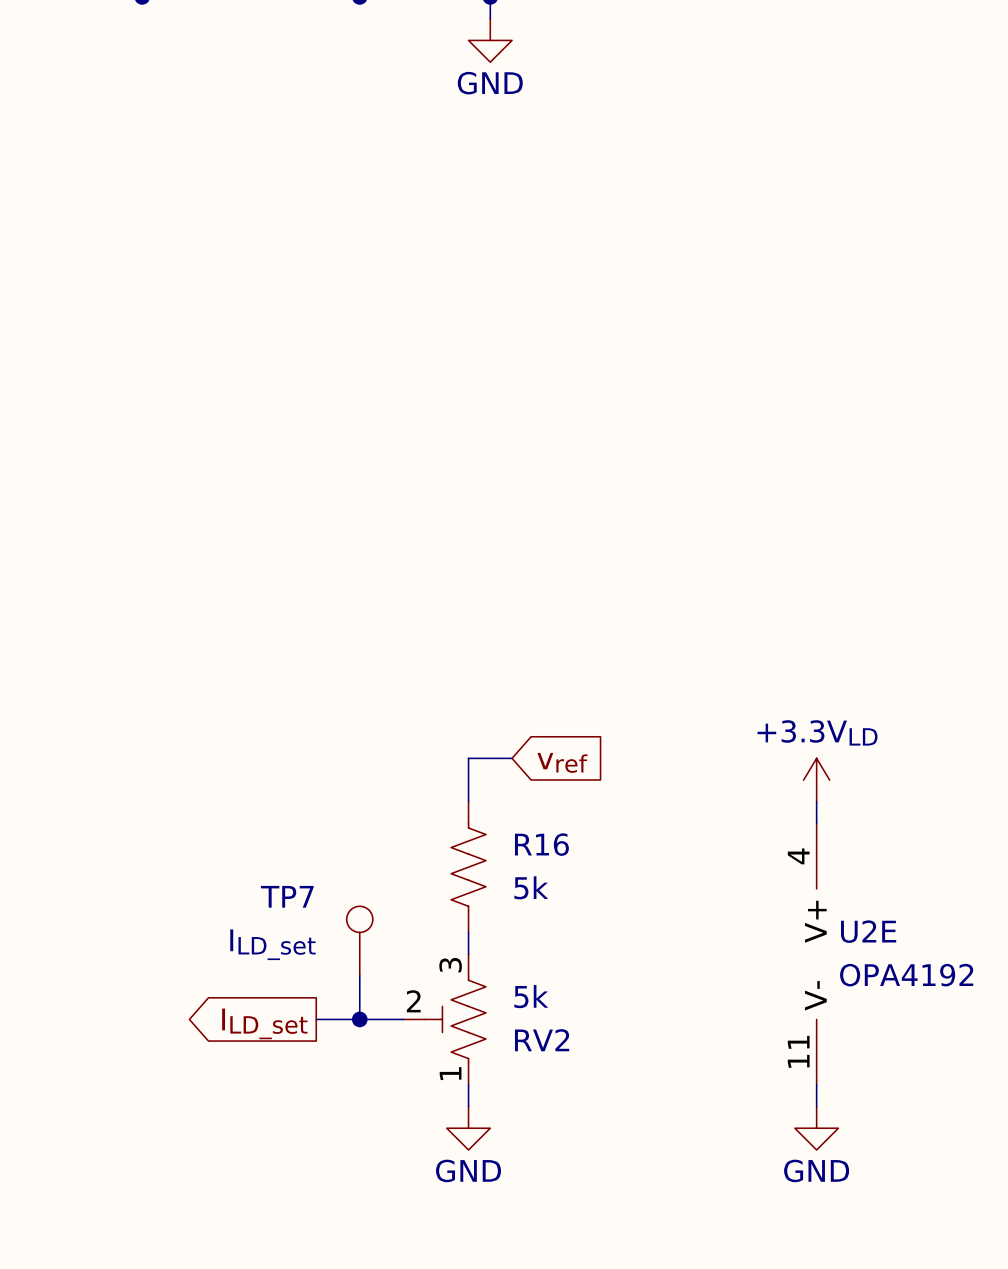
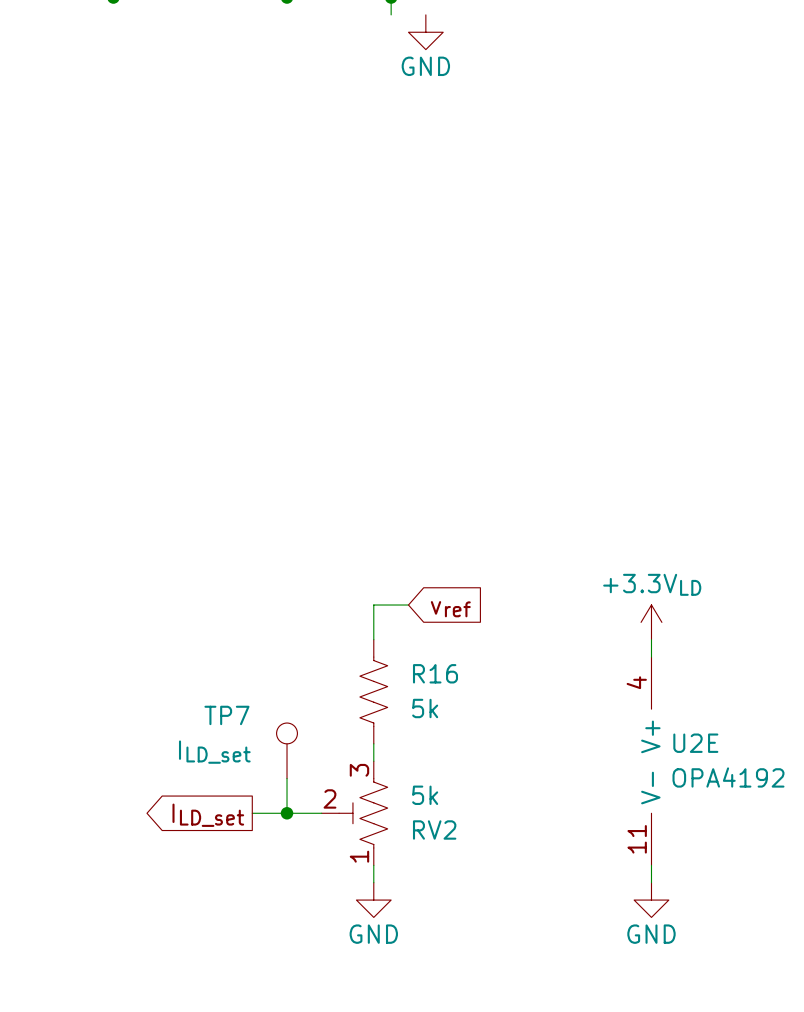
power symbol position: GND (490, 40) -> GND (425, 32)

